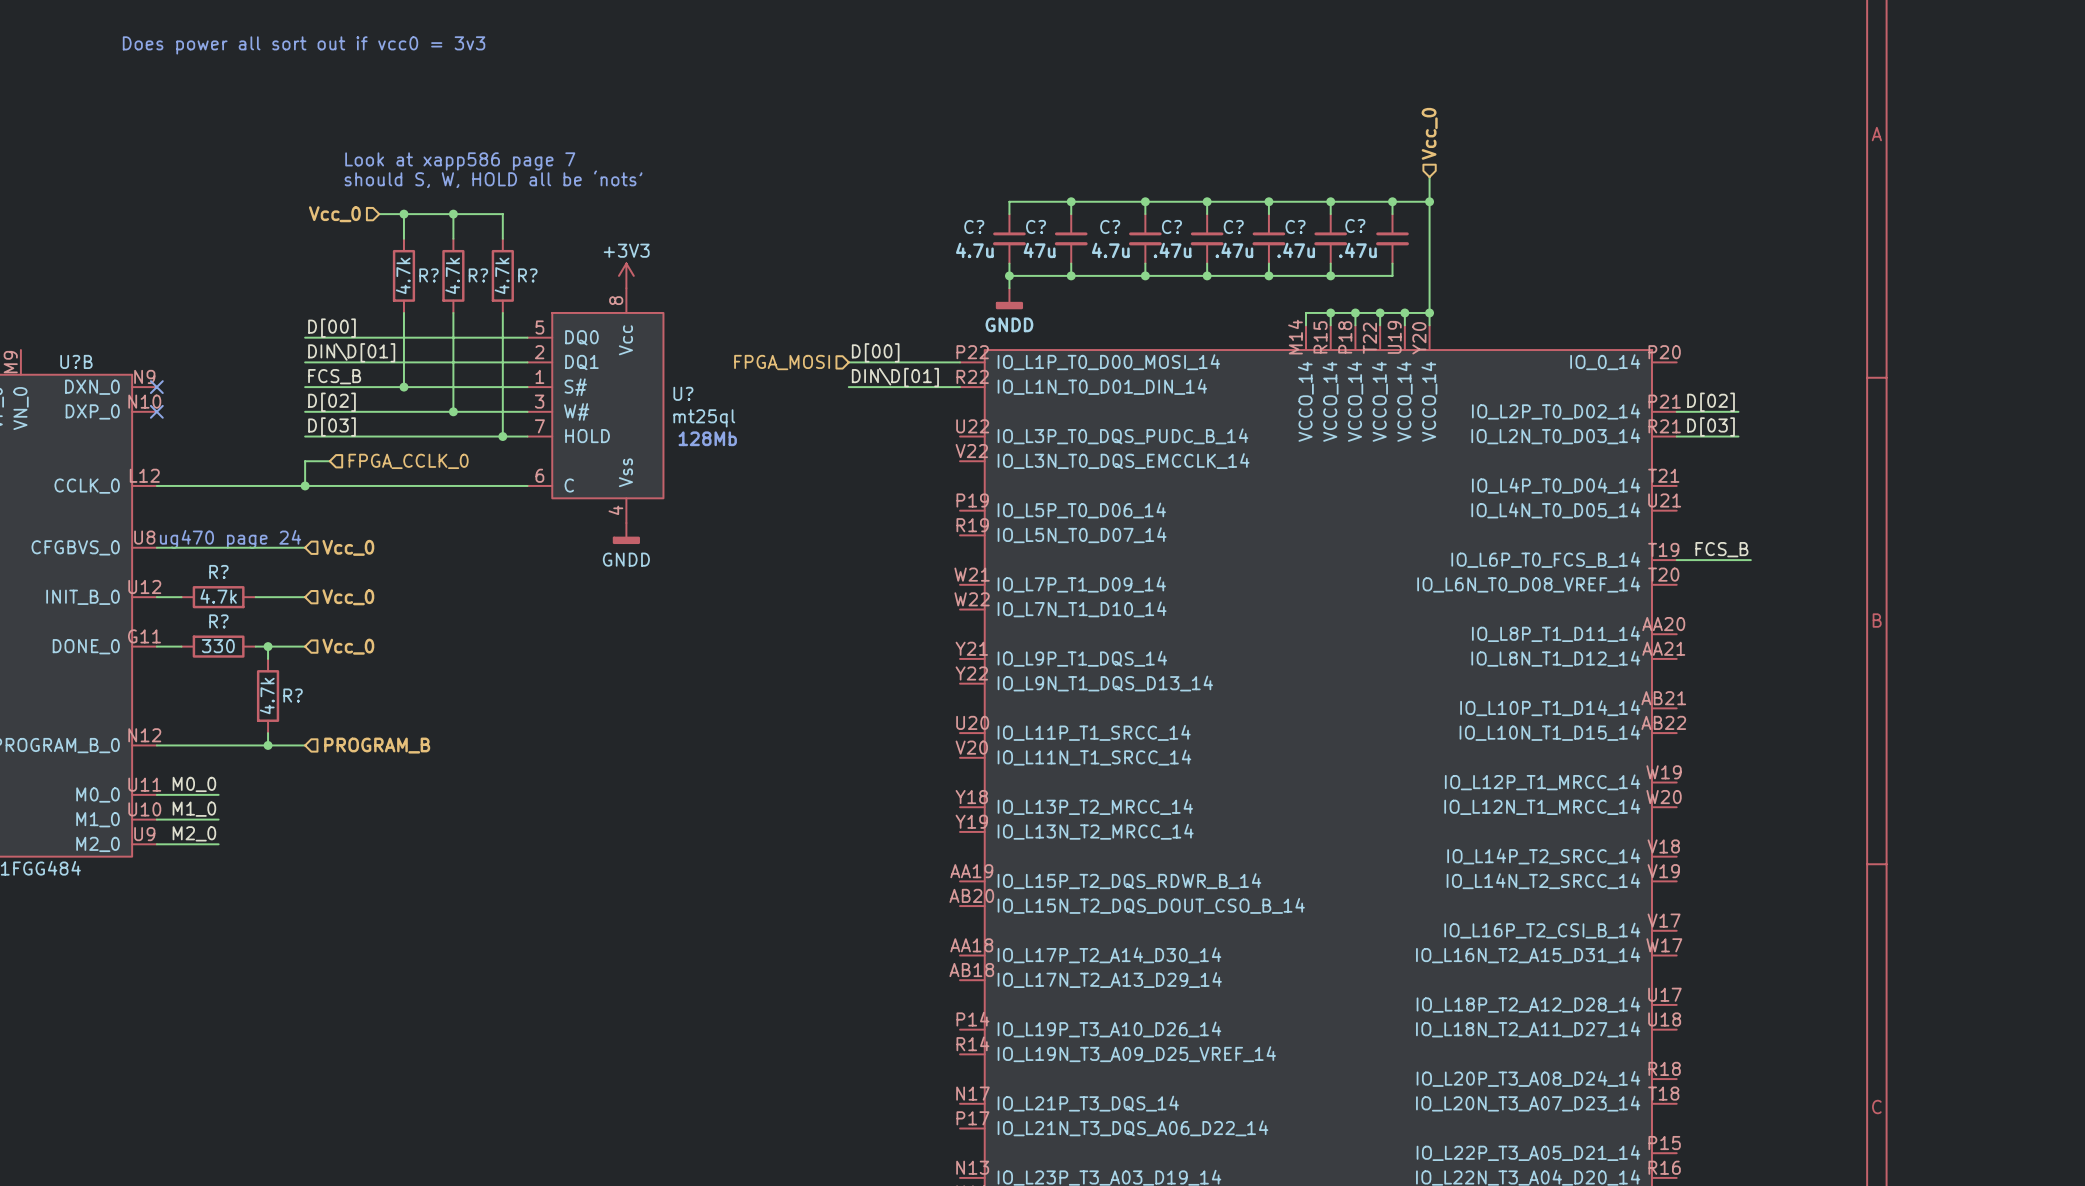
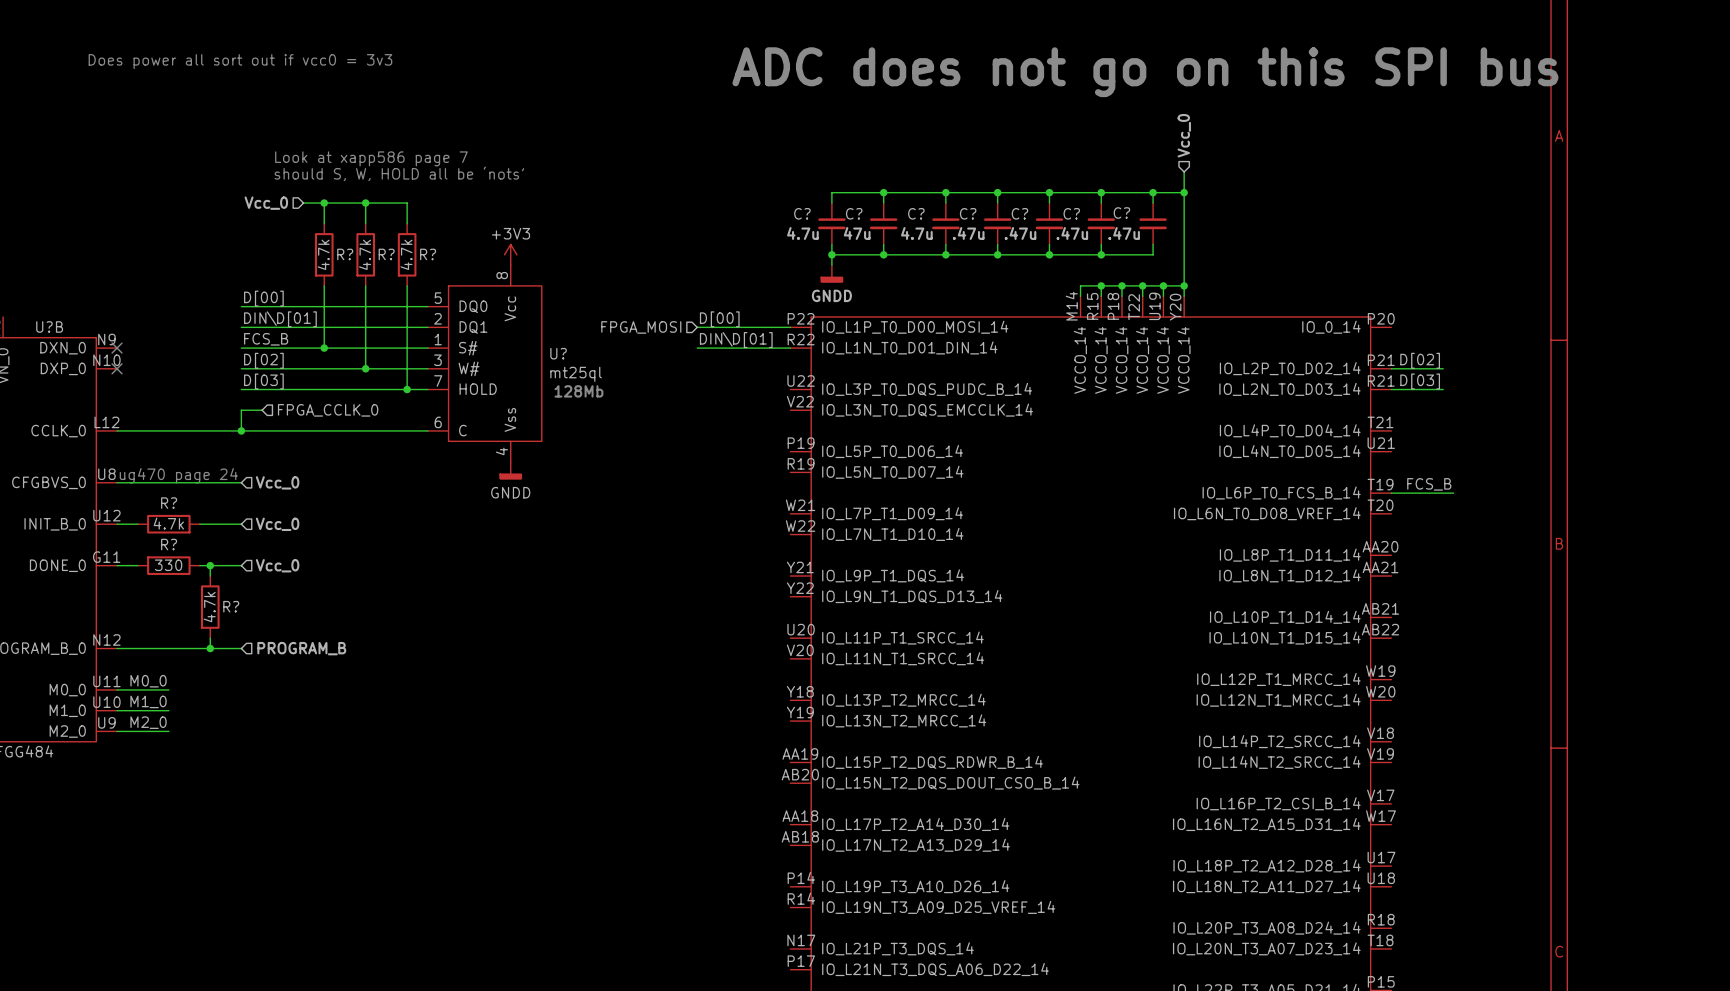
text: none -> ADC does not go on this SPI bus (1145, 72)

